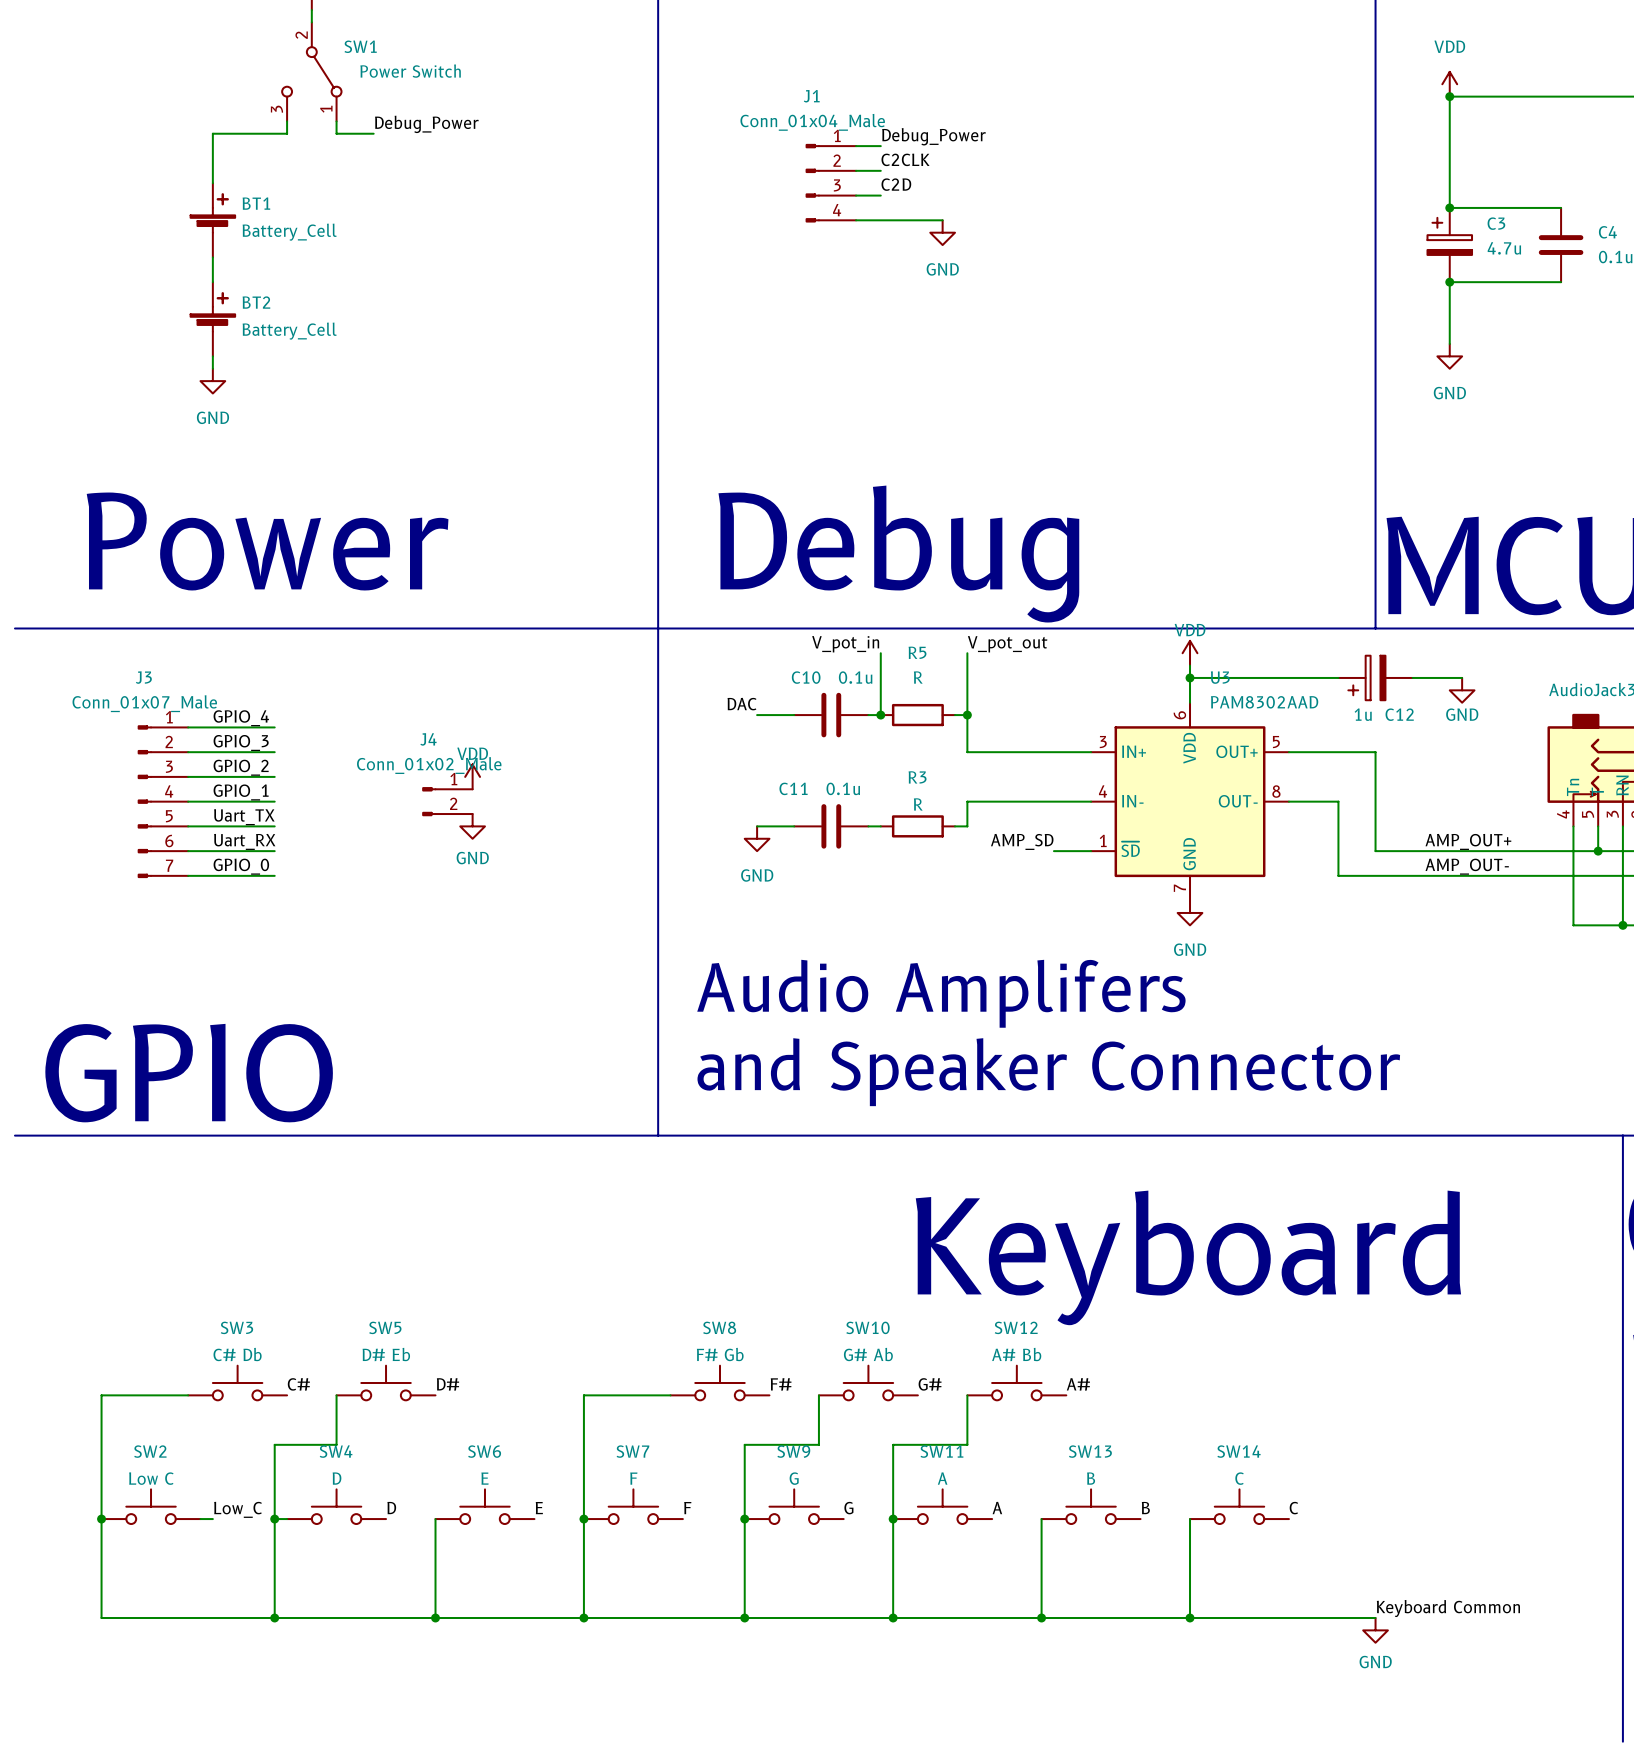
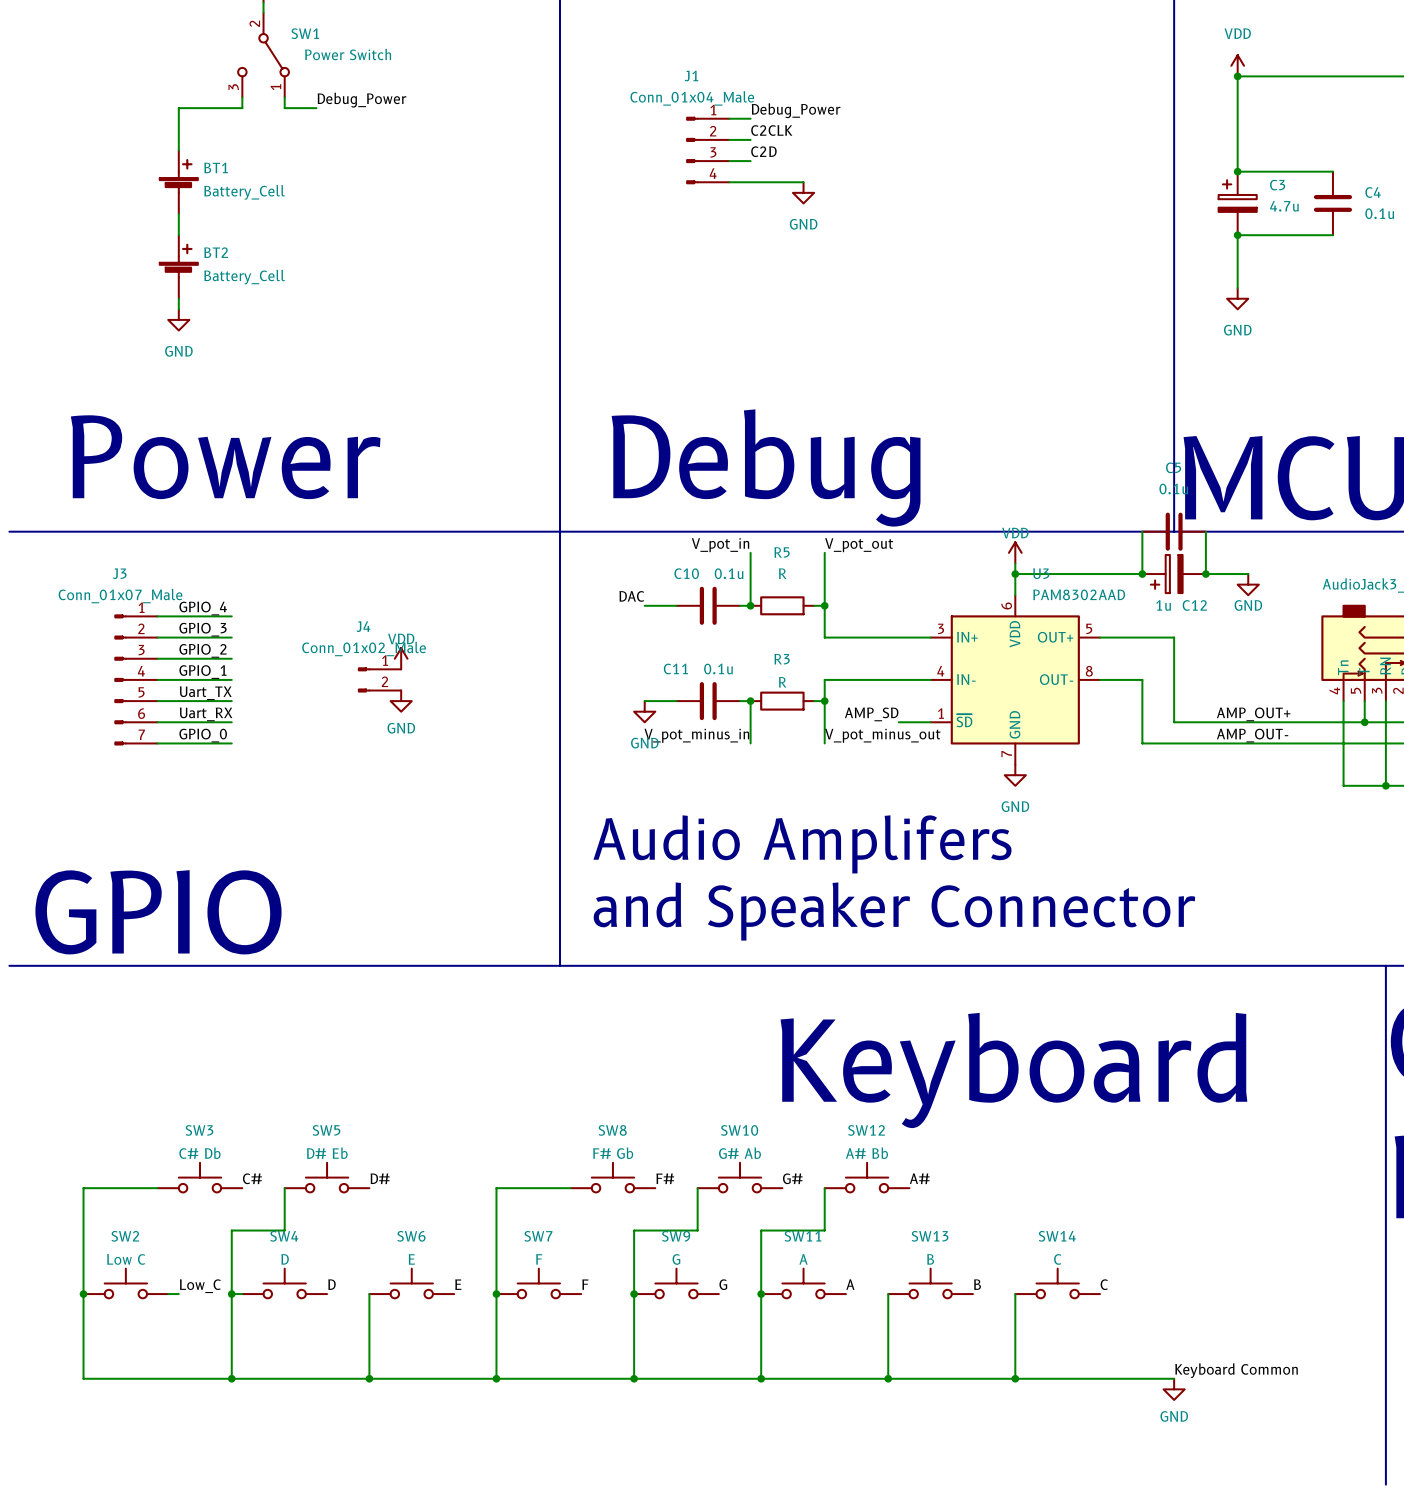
wire: none -> (1142, 531) (1142, 574)
C5: none -> 0.1u (1174, 531)
wire: none -> (1205, 531) (1205, 574)
junction: none -> (1142, 574)
junction: none -> (1205, 574)
wire: none -> (750, 701) (750, 743)
junction: none -> (750, 701)
wire: none -> (824, 701) (824, 743)
junction: none -> (824, 701)
label: none -> V_pot_minus_in (696, 735)
label: none -> V_pot_minus_out (882, 735)

